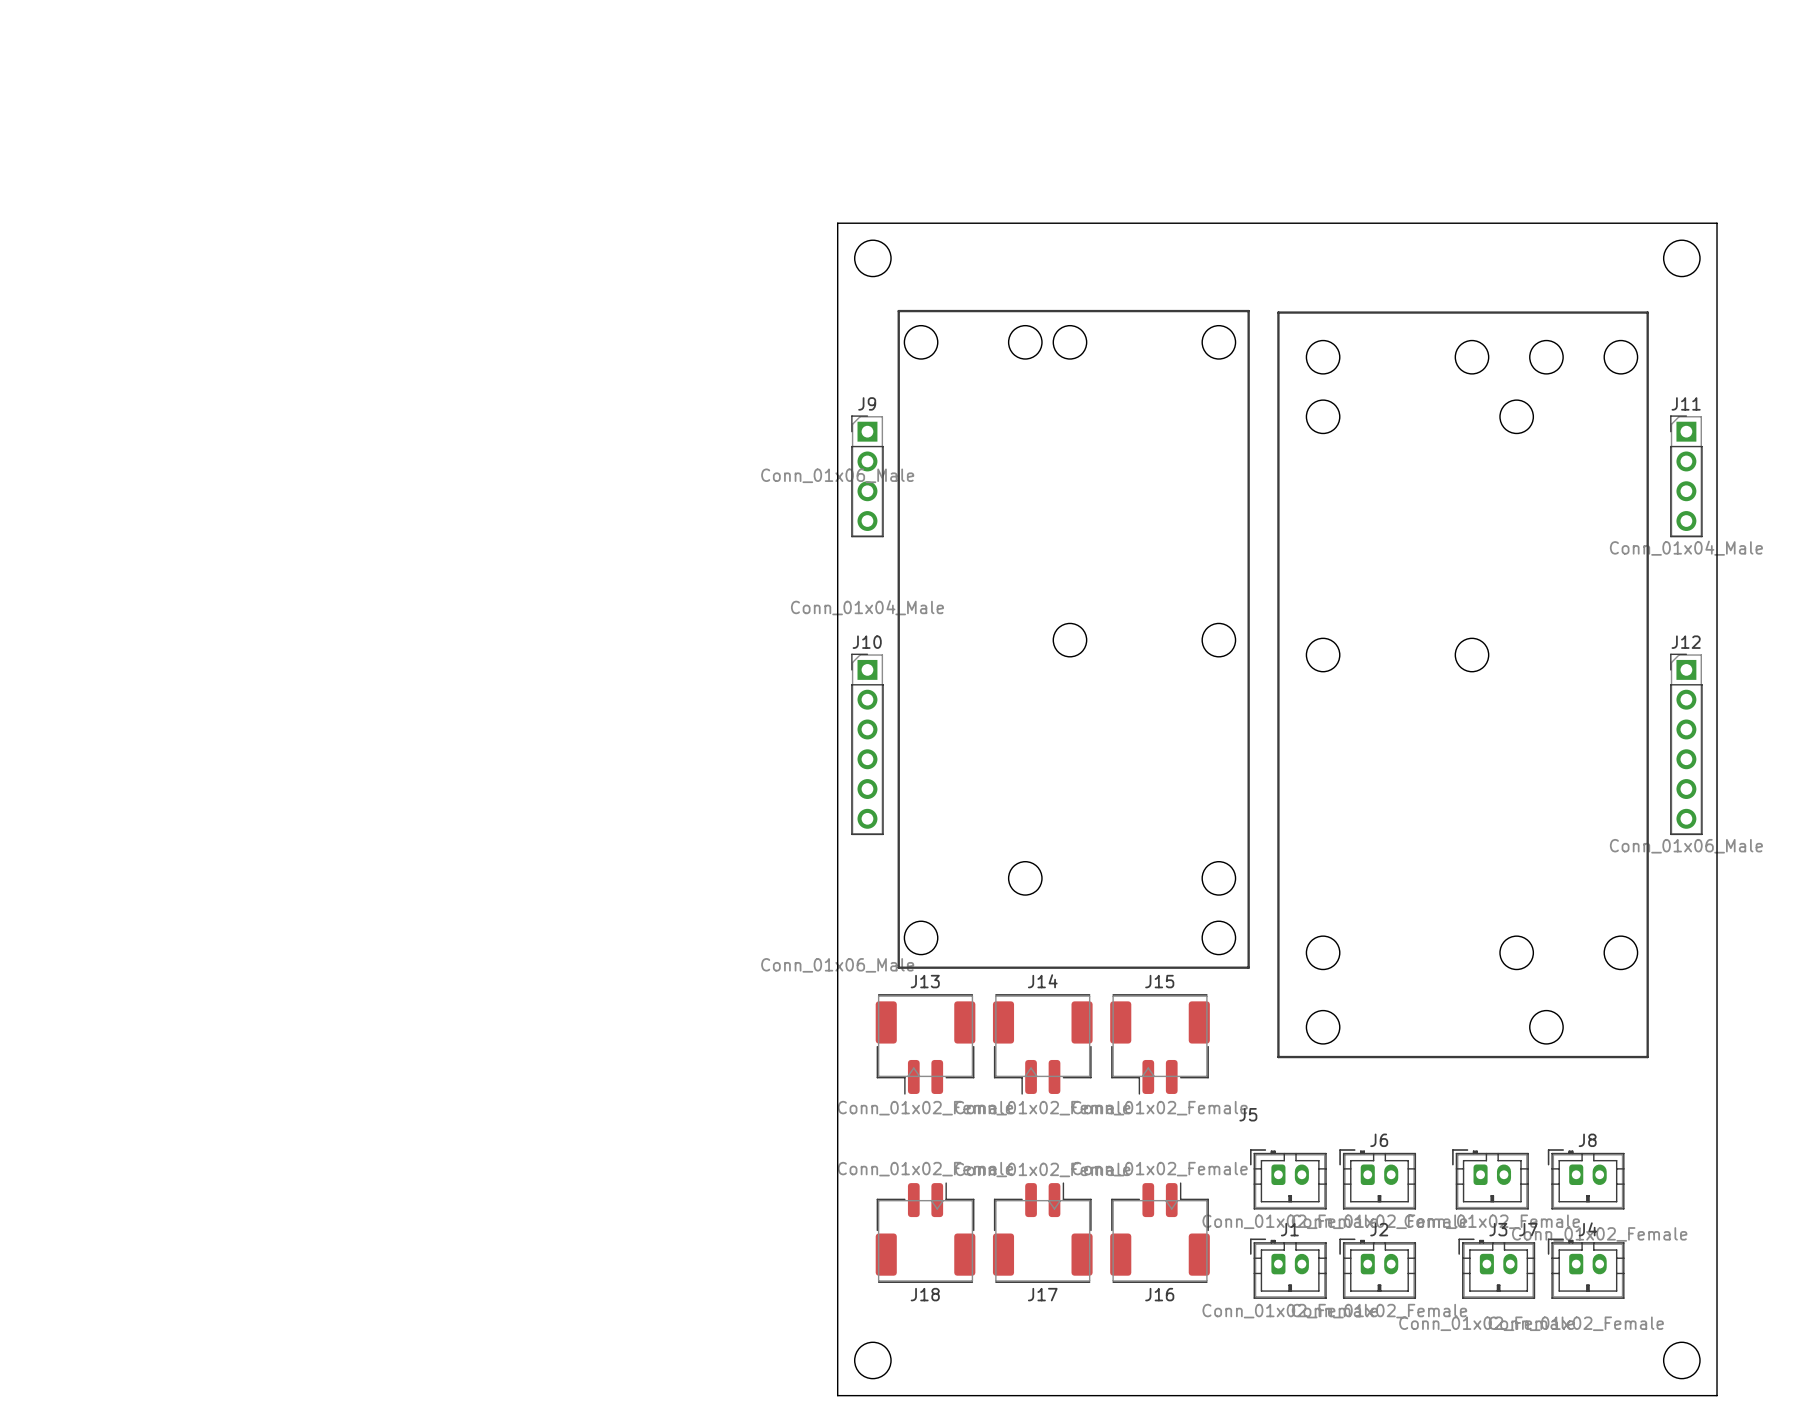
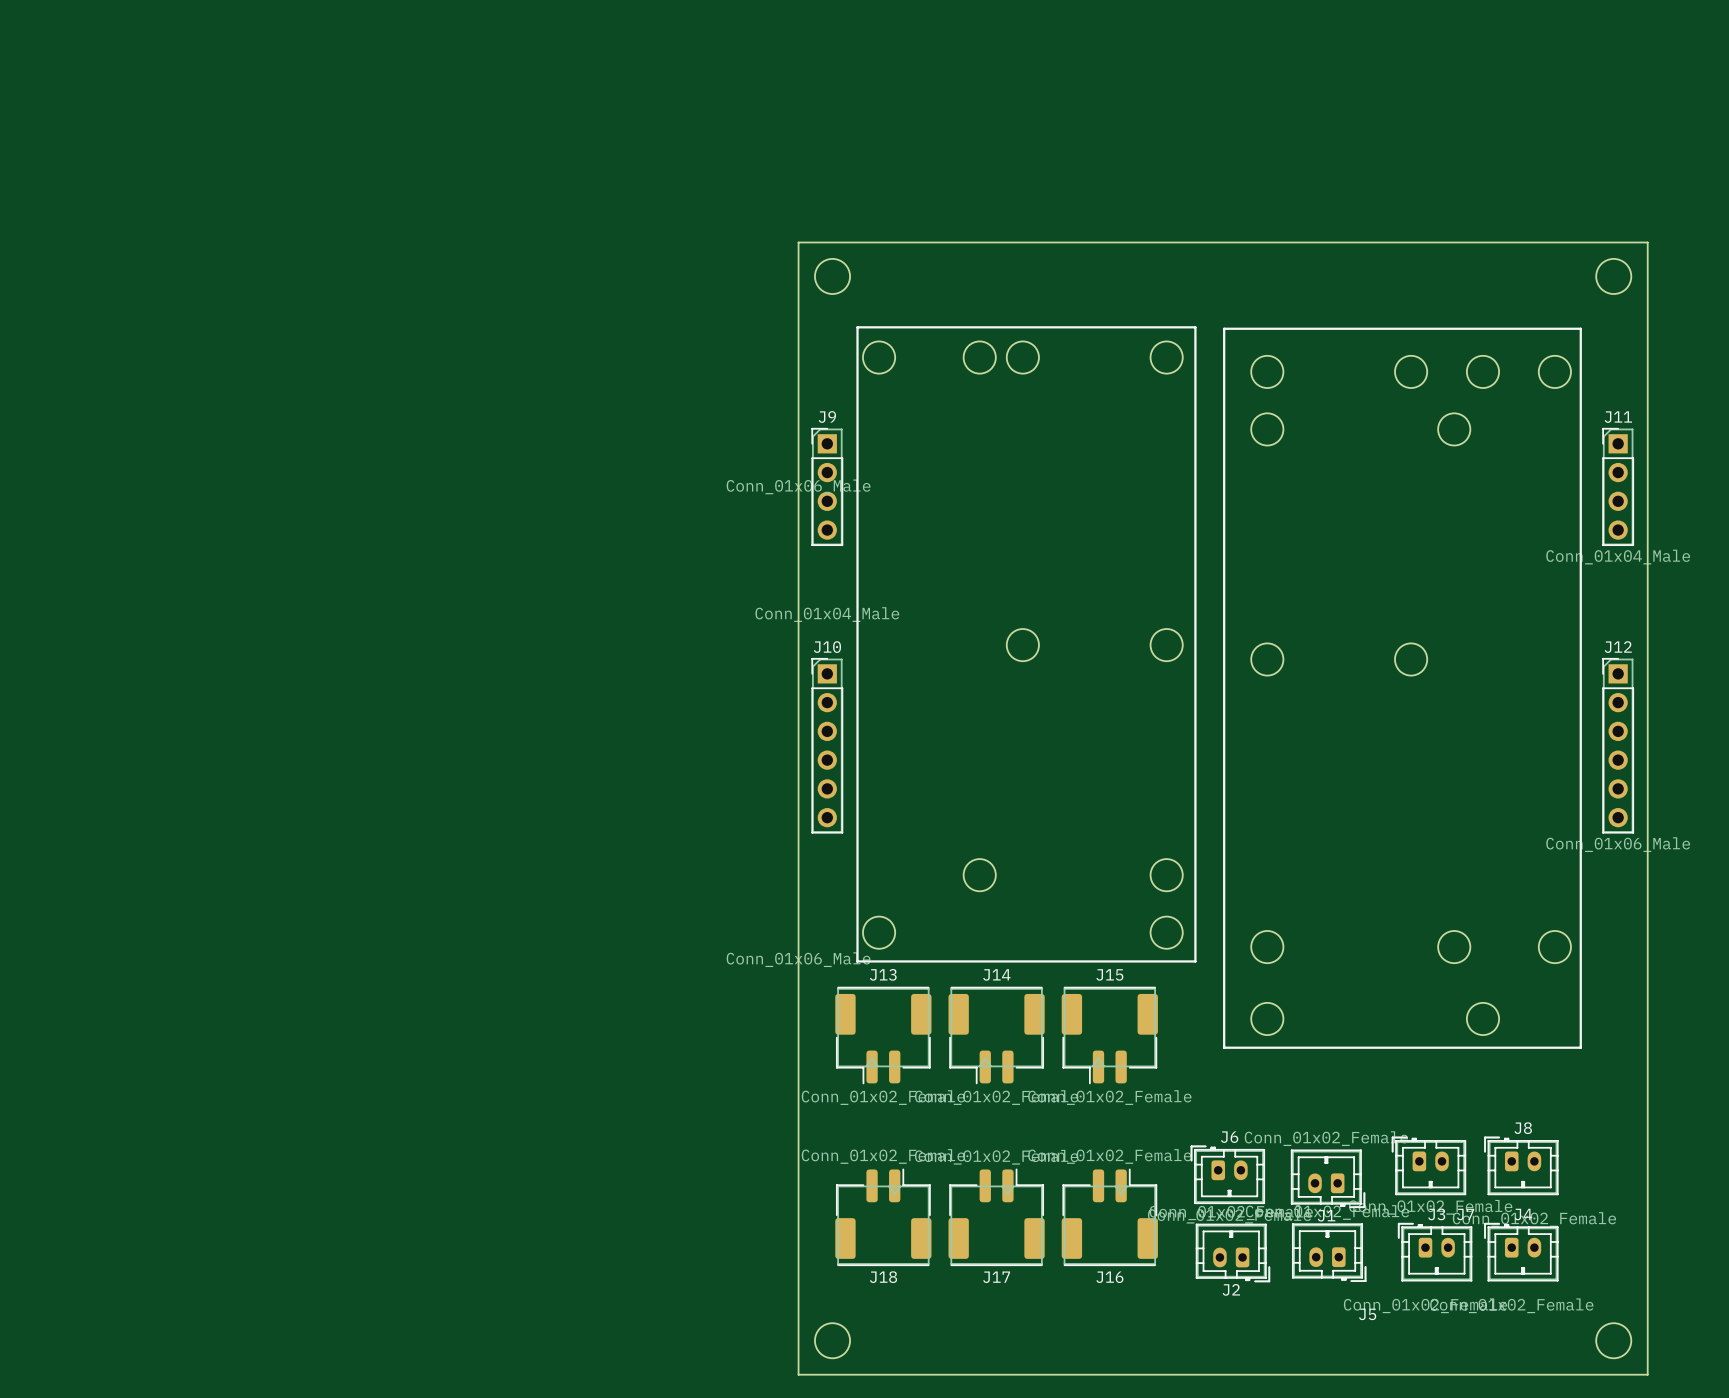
J5 rotation: 0° (1288, 1179) -> 180° (1329, 1252)
J5 position: (1288, 1179) -> (1329, 1252)
J6 position: (1377, 1179) -> (1227, 1174)
J1 rotation: 0° (1288, 1268) -> 180° (1328, 1178)
J1 position: (1288, 1268) -> (1328, 1178)
J2 rotation: 0° (1377, 1268) -> 180° (1232, 1252)
J2 position: (1377, 1268) -> (1232, 1252)

